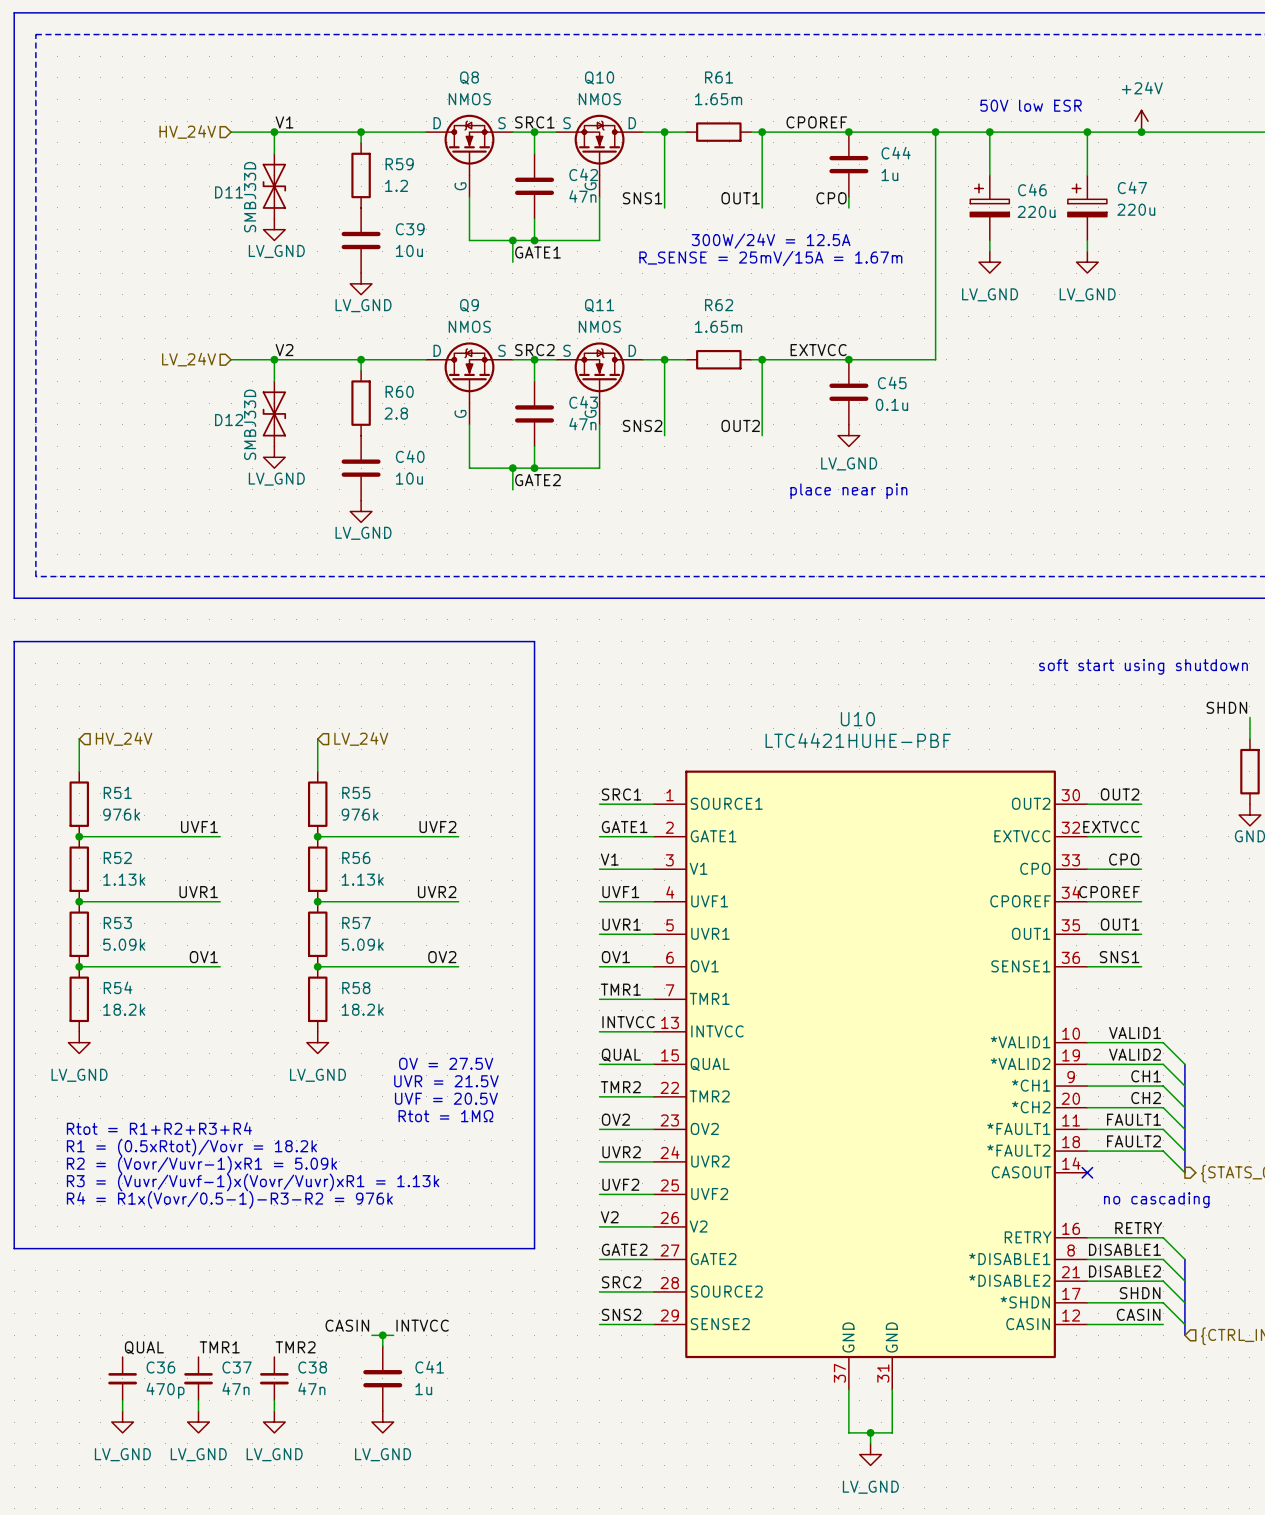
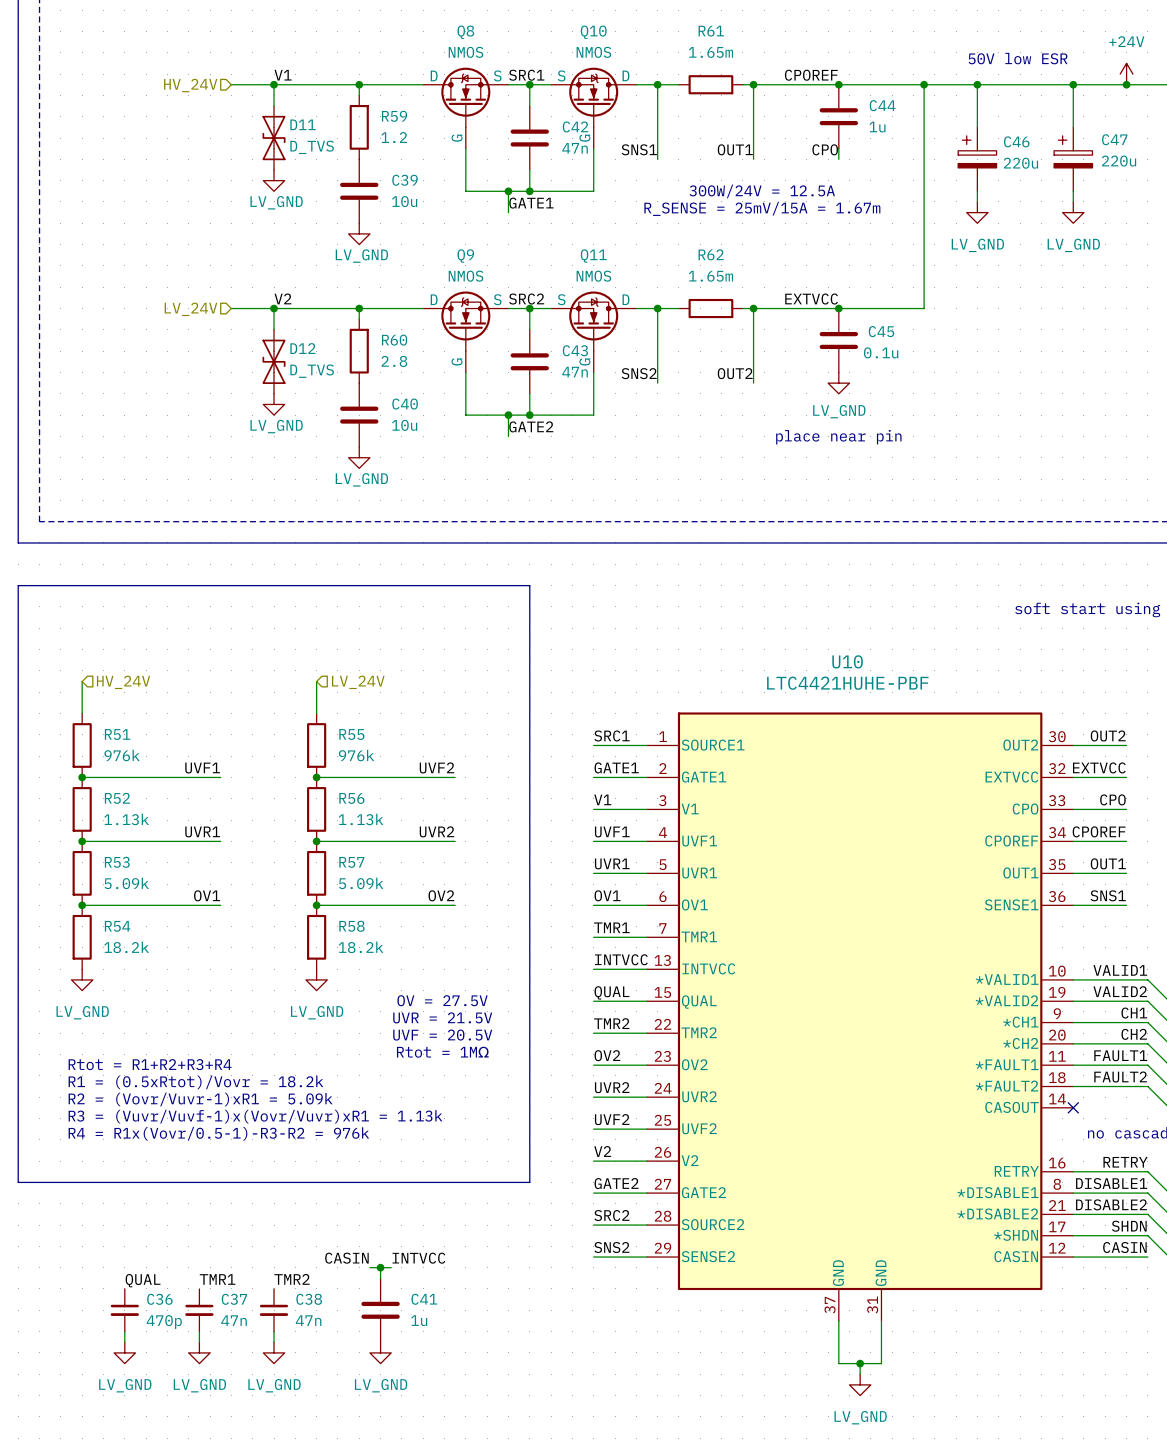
D11 name position: D11 (229, 192) -> D11 (303, 124)
D11 value: SMBJ33D (250, 197) -> D_TVS (312, 147)
D12 name position: D12 (229, 420) -> D12 (302, 348)
D12 value: SMBJ33D (250, 424) -> D_TVS (312, 371)

